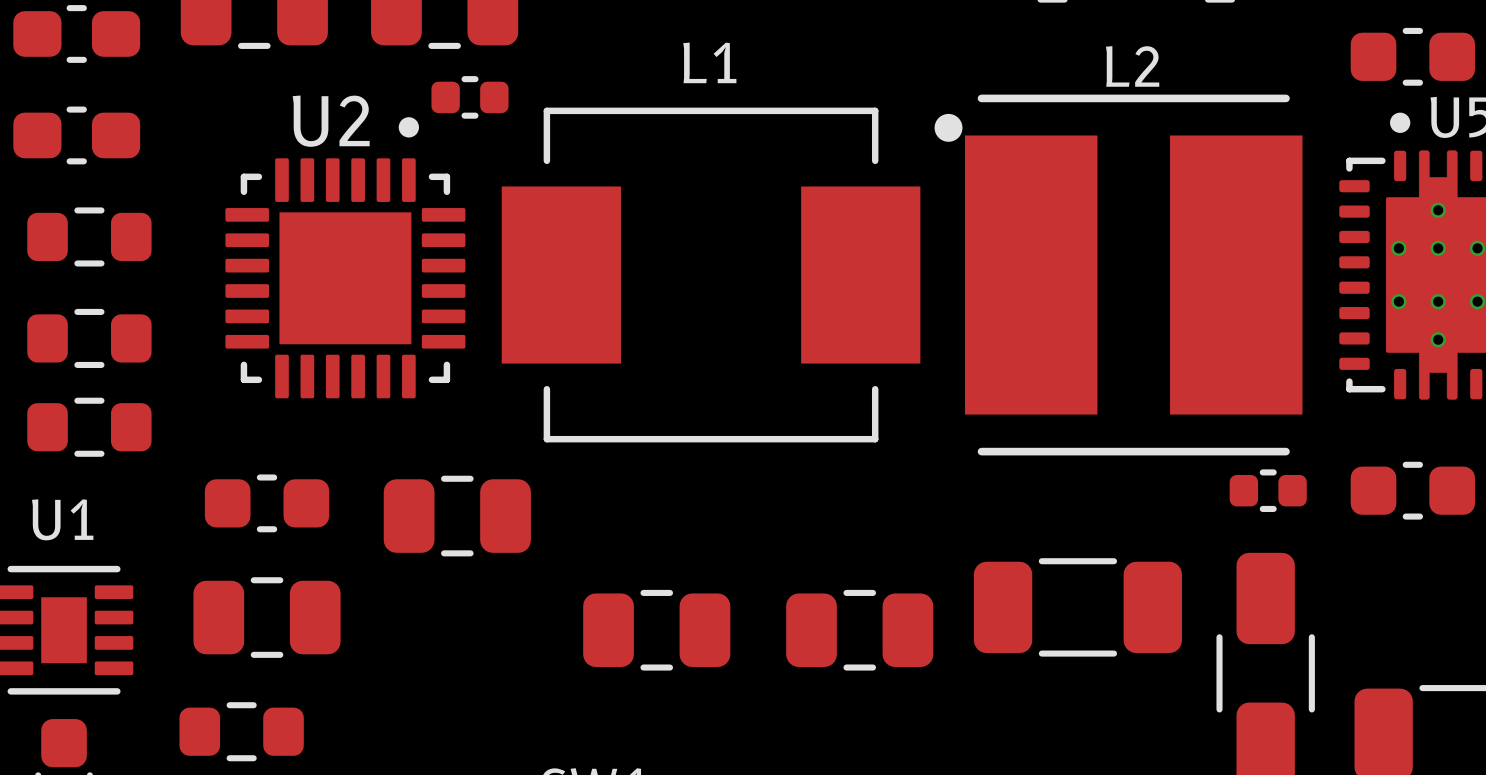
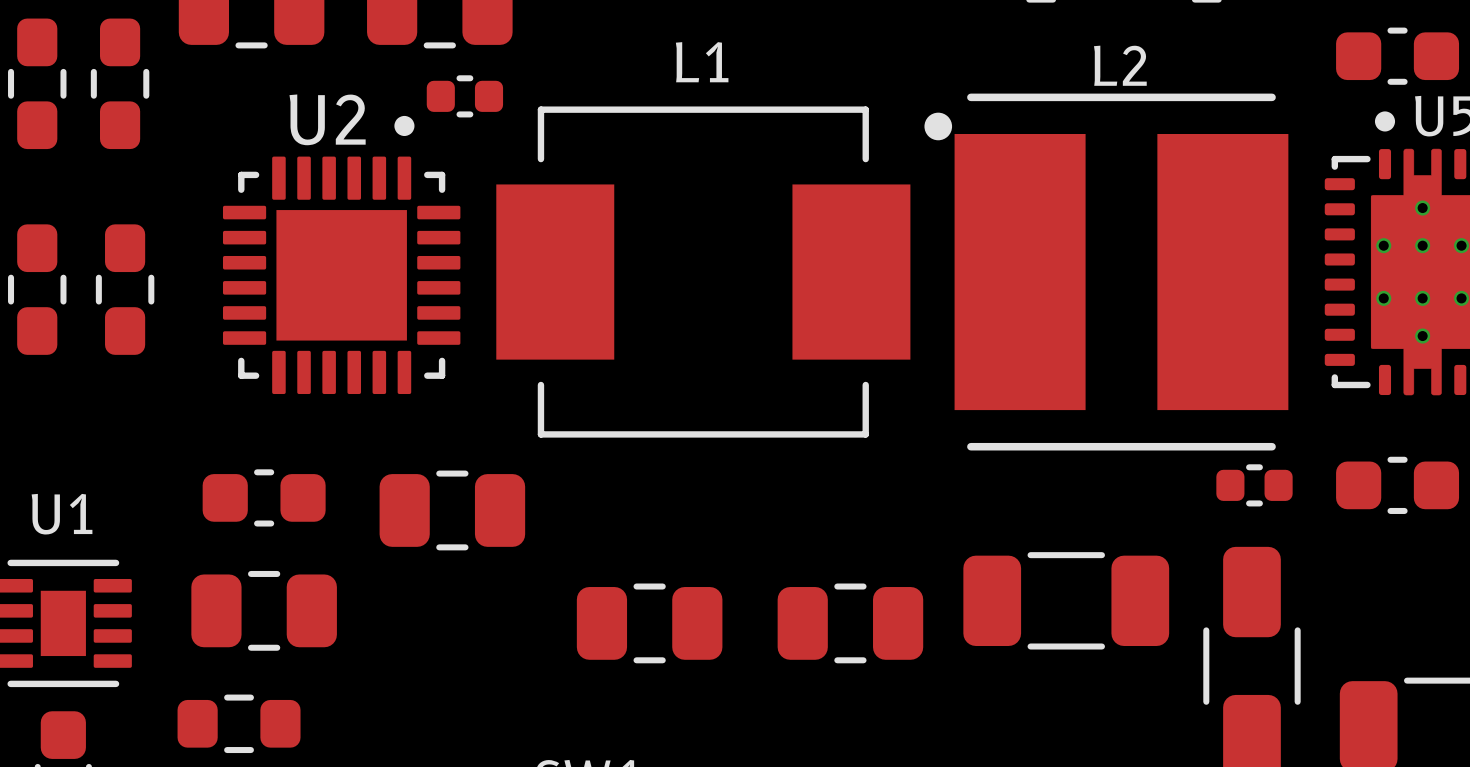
part: (76, 33) -> none
part: none -> (37, 83)
part: none -> (120, 83)
part: (76, 135) -> none
part: (89, 236) -> none
part: none -> (37, 289)
part: none -> (125, 289)
part: (89, 338) -> none
part: (89, 427) -> none

